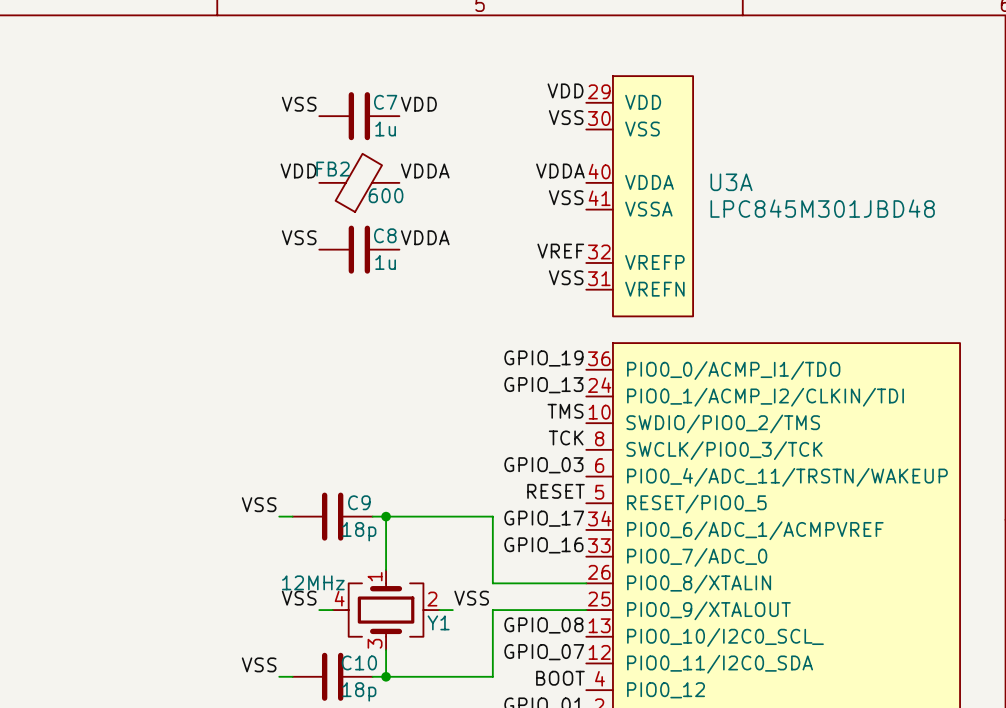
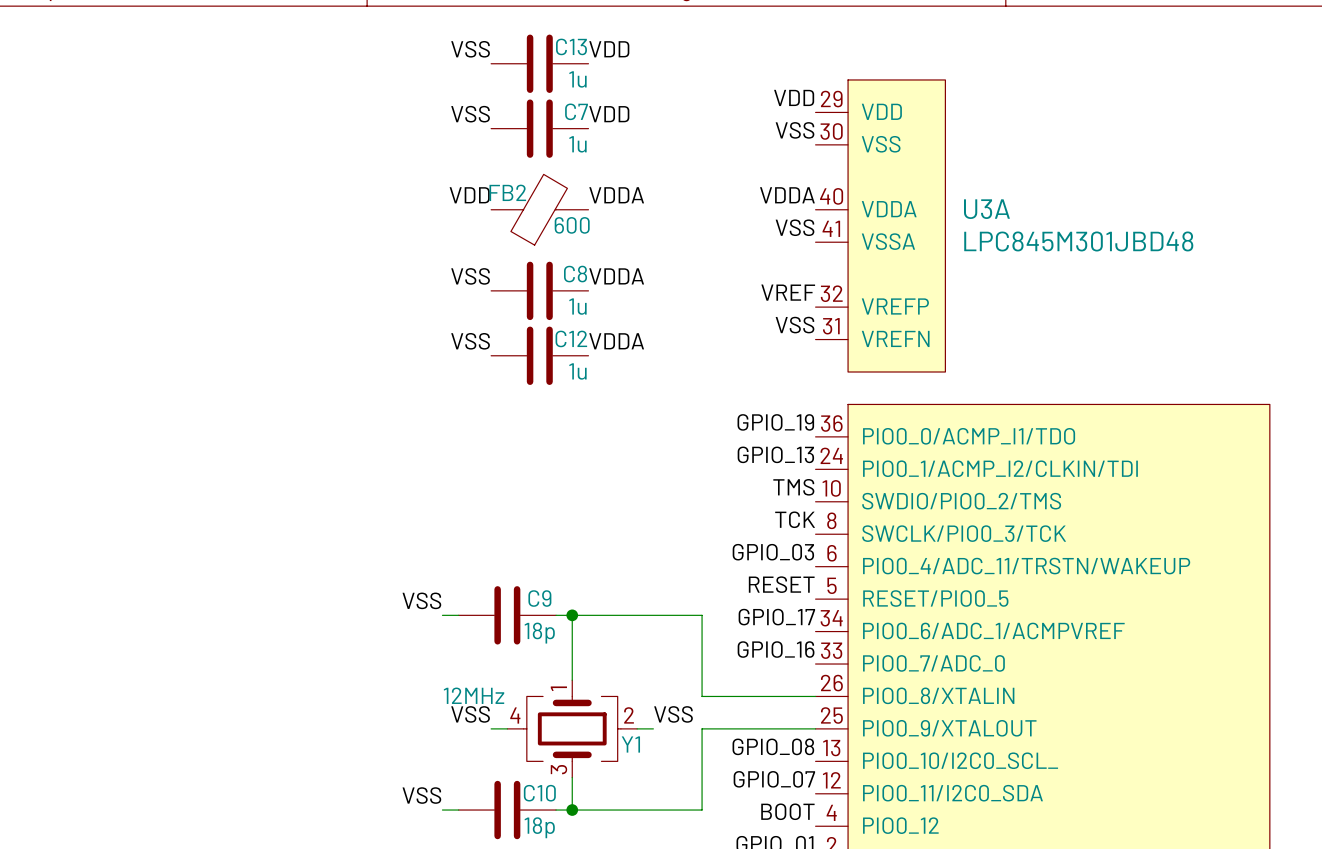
label: none -> VSS (470, 49)
label: none -> VDD (609, 49)
C13: none -> 1u (539, 63)
label: none -> VSS (470, 341)
label: none -> VDDA (616, 341)
C12: none -> 1u (539, 355)

